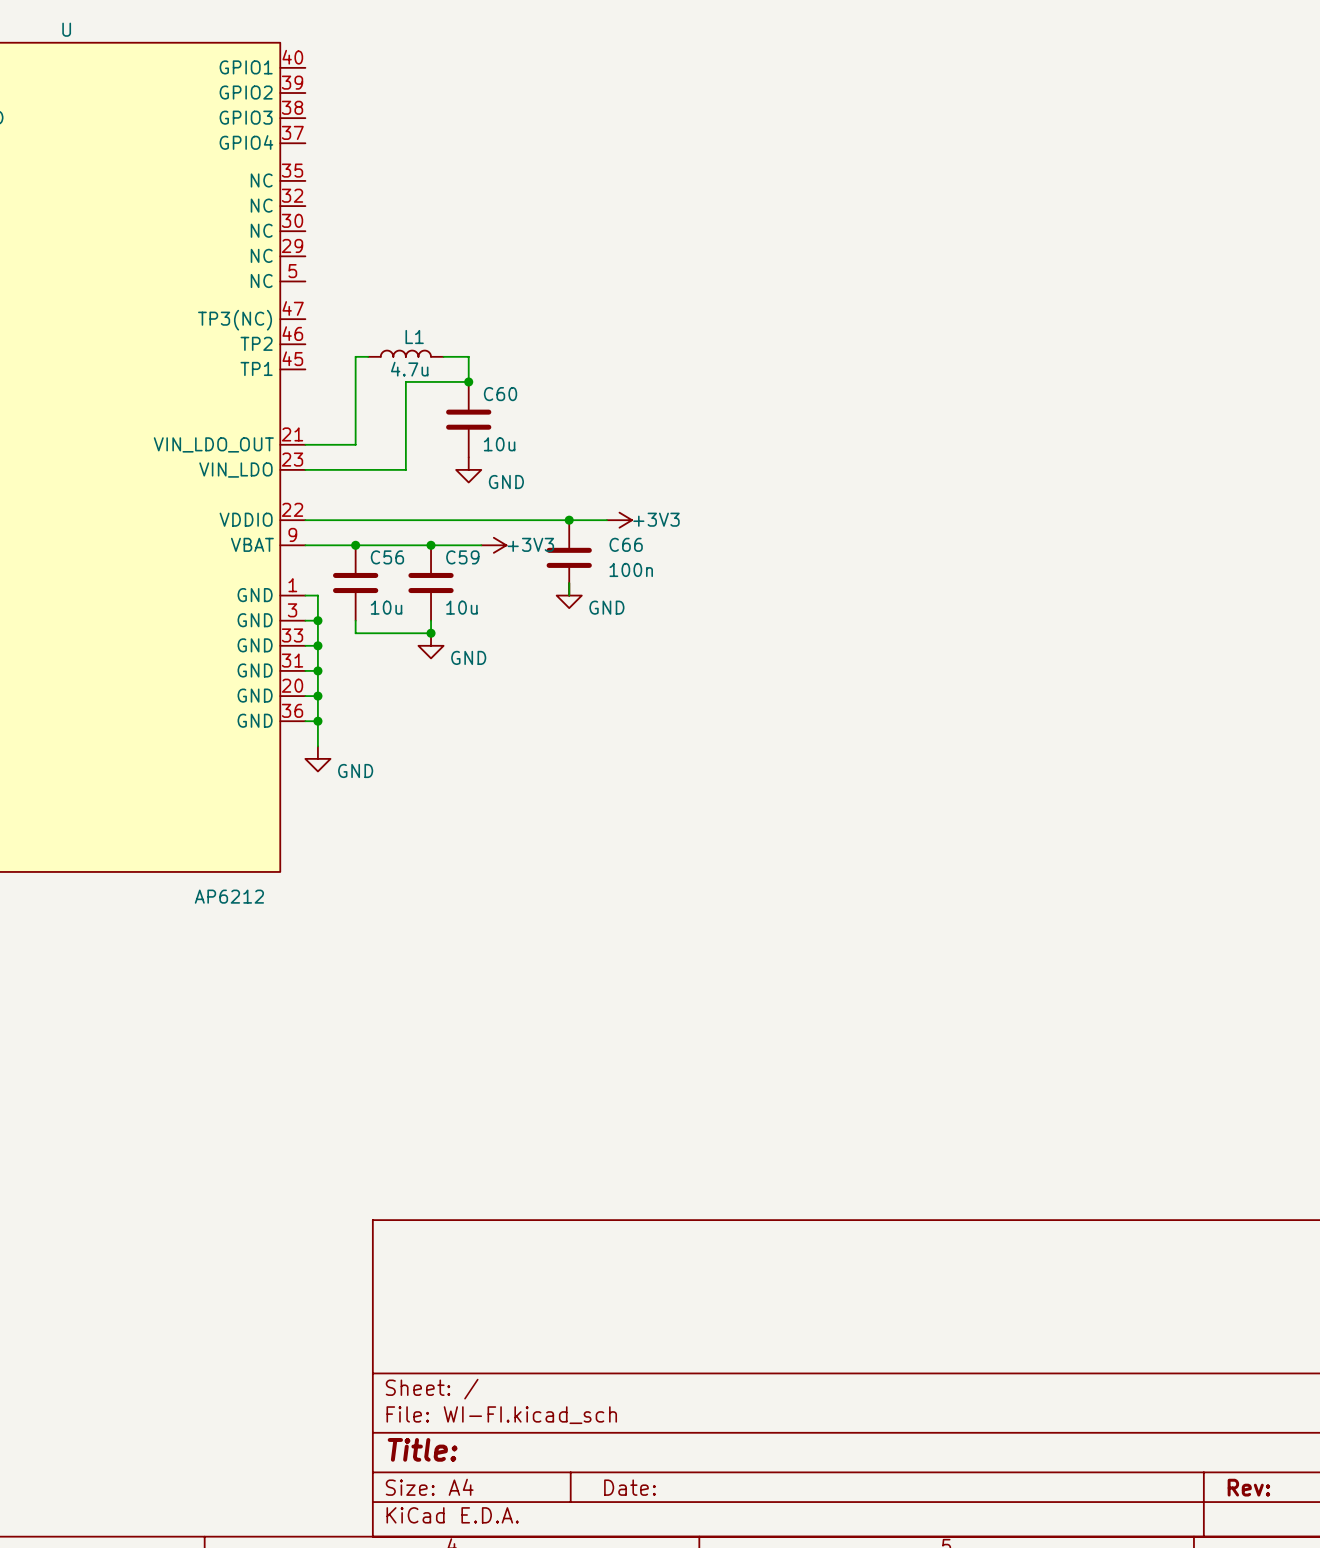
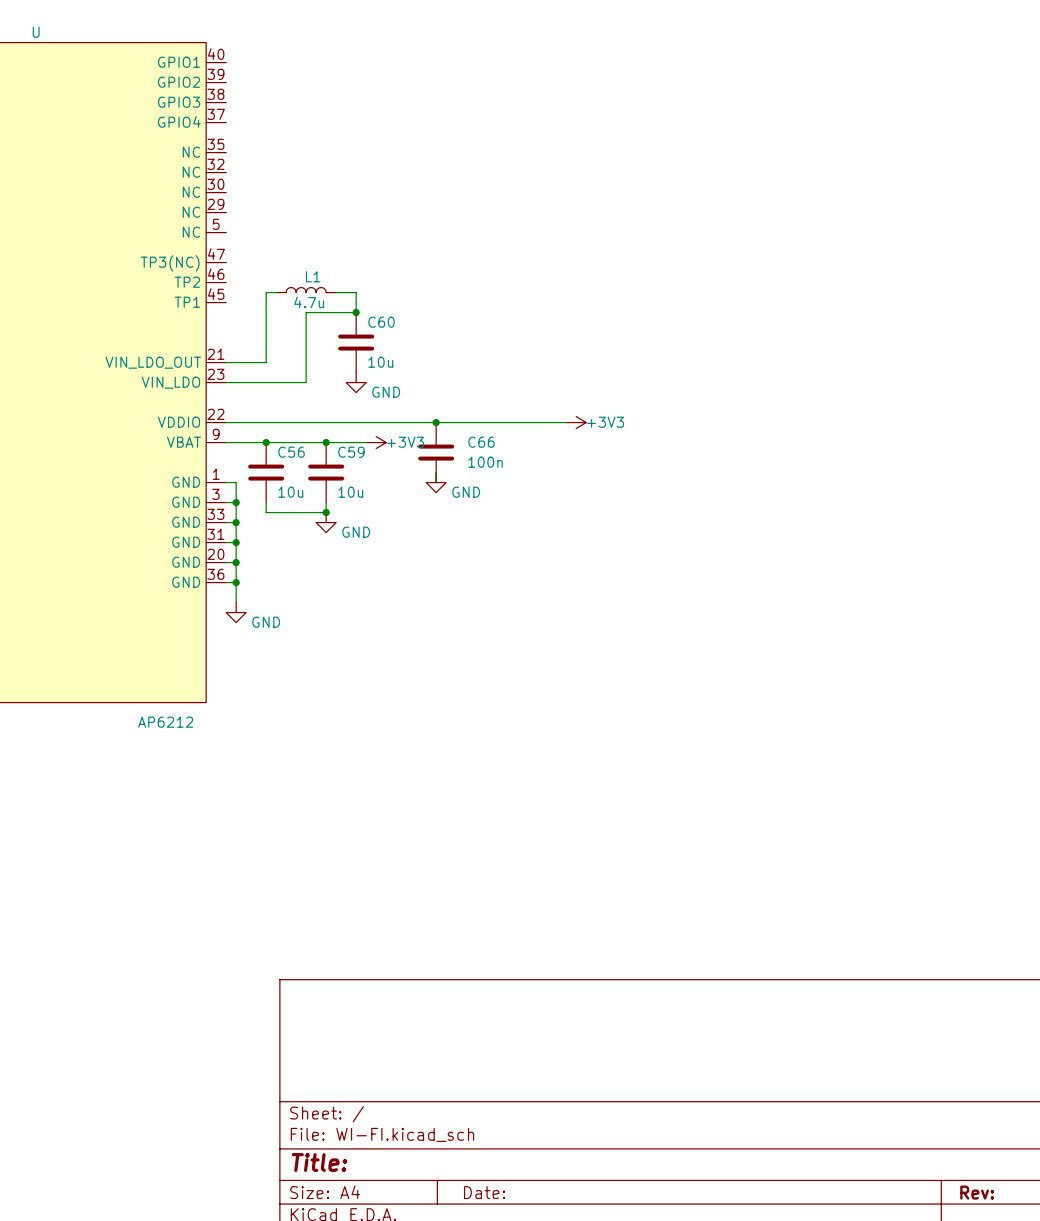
wire: none -> (466, 422) (566, 422)
power symbol position: +3V3 (619, 520) -> +3V3 (576, 422)

